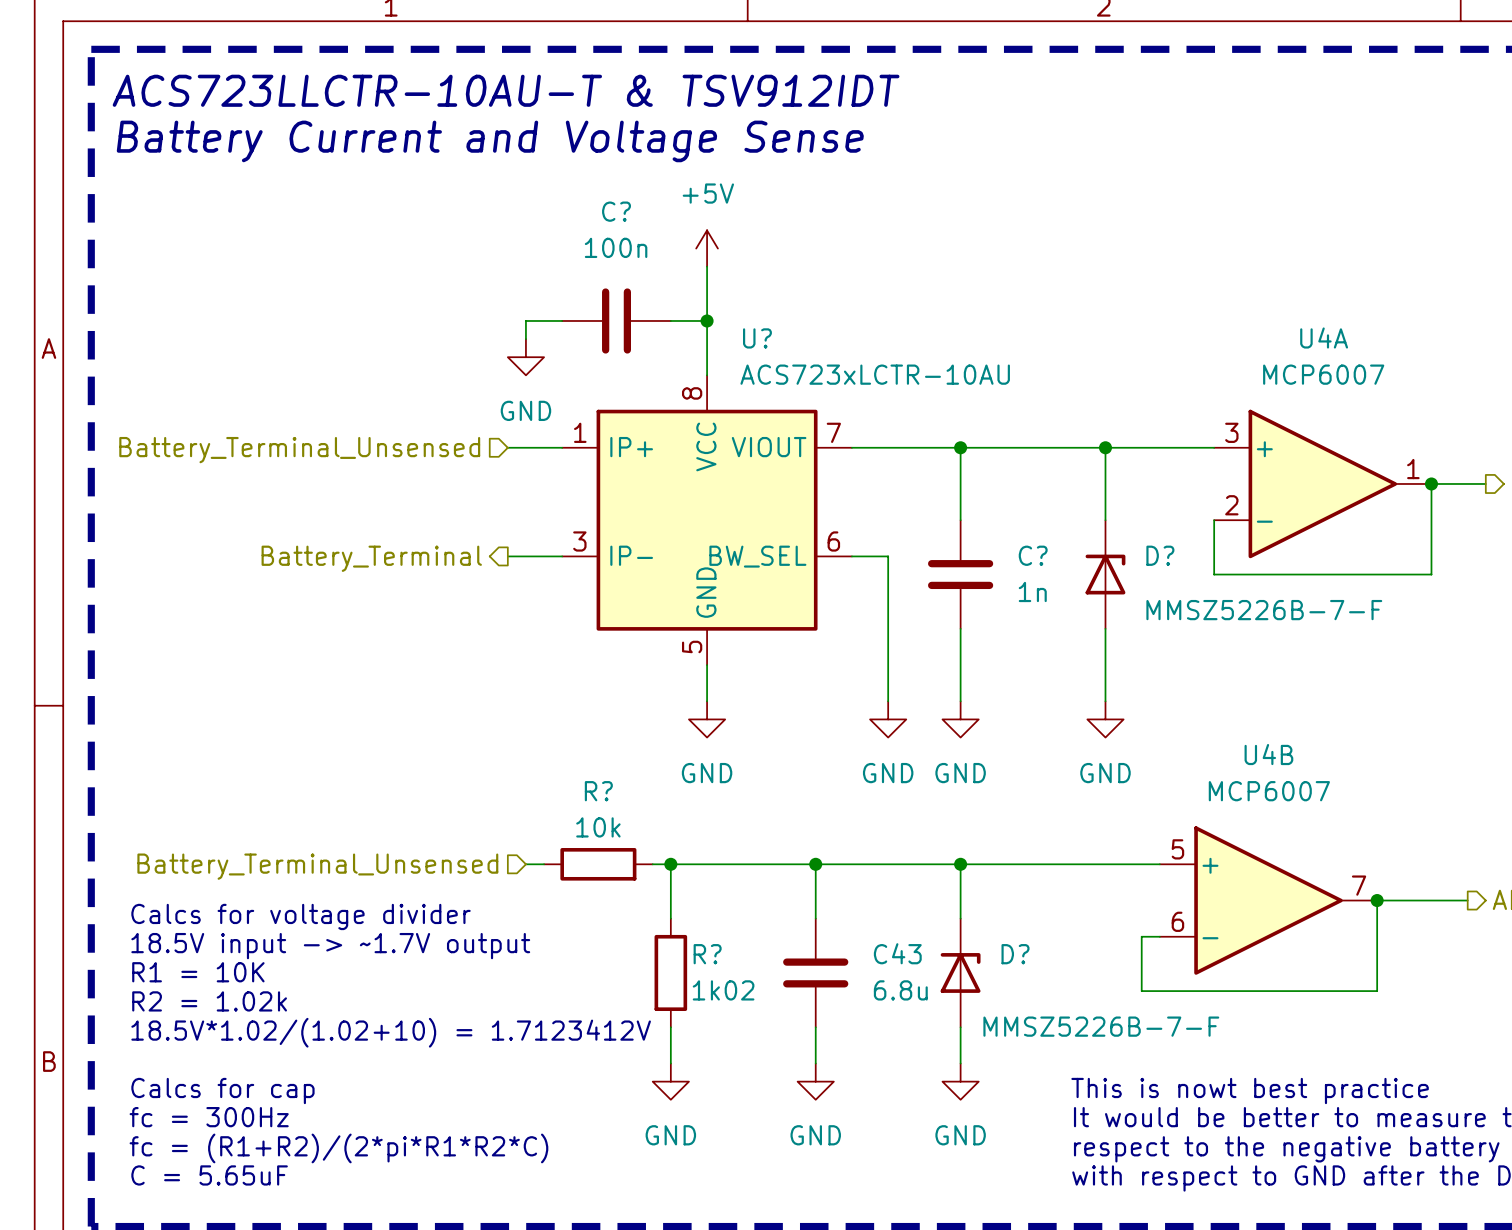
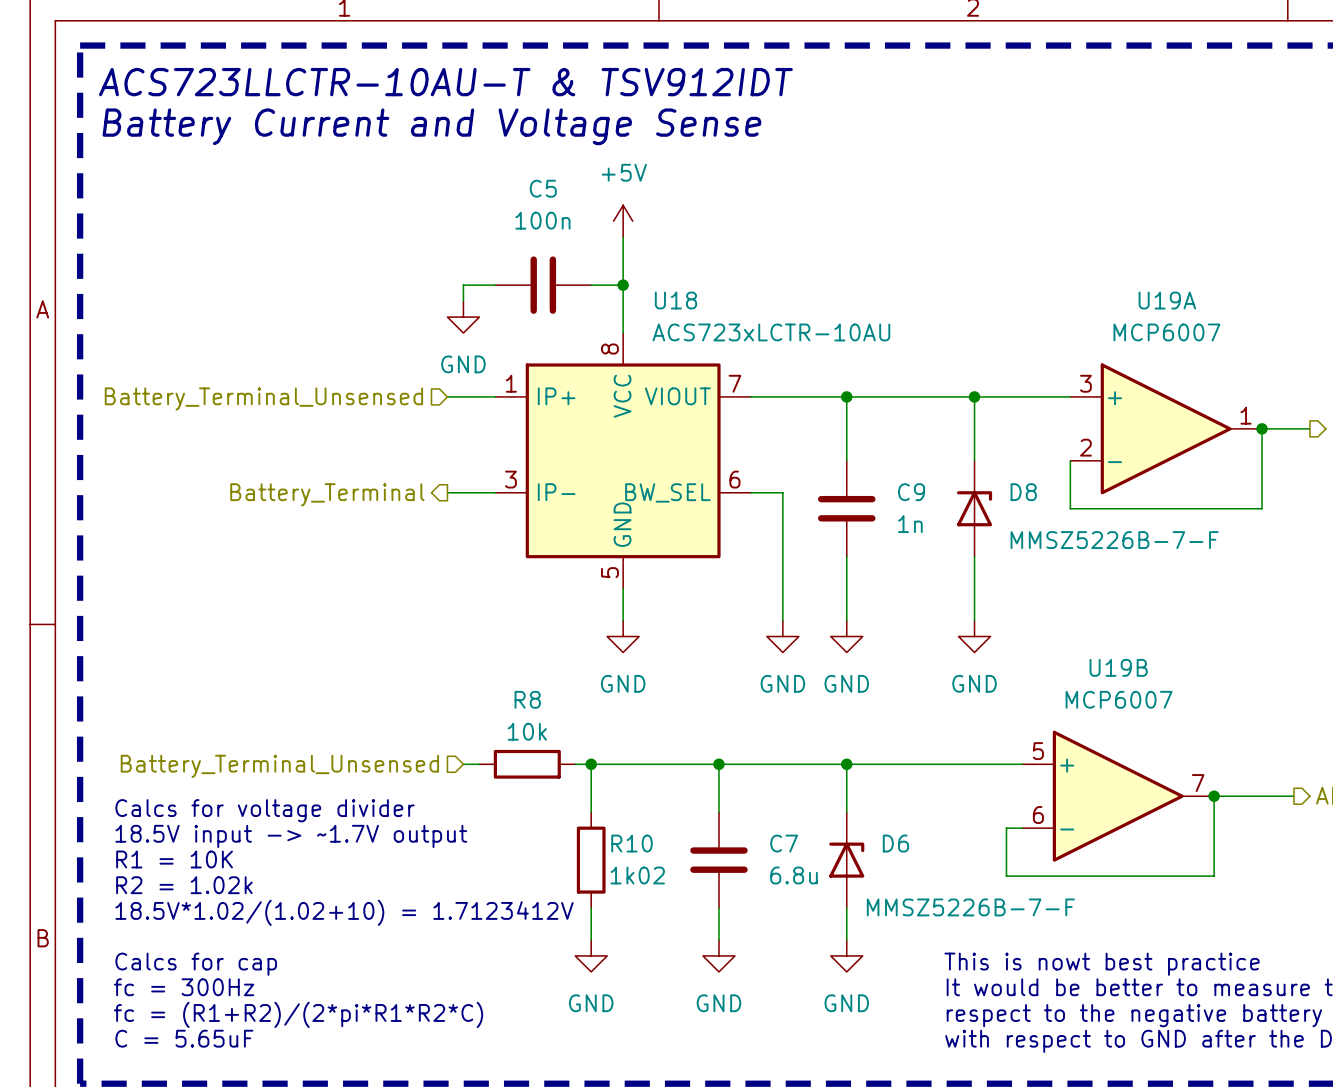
C? name: C? (616, 211) -> C5 (543, 188)
U4A name: U4A (1324, 337) -> U19A (1167, 300)
U? name: U? (757, 338) -> U18 (675, 300)
C? name: C? (1033, 555) -> C9 (911, 492)
D? name: D? (1160, 555) -> D8 (1023, 492)
U4B name: U4B (1268, 754) -> U19B (1118, 667)
R? name: R? (598, 791) -> R8 (527, 699)
C43 name: C43 (897, 953) -> C7 (784, 843)
R? name: R? (707, 954) -> R10 (632, 843)
D? name: D? (1015, 954) -> D6 (895, 843)

